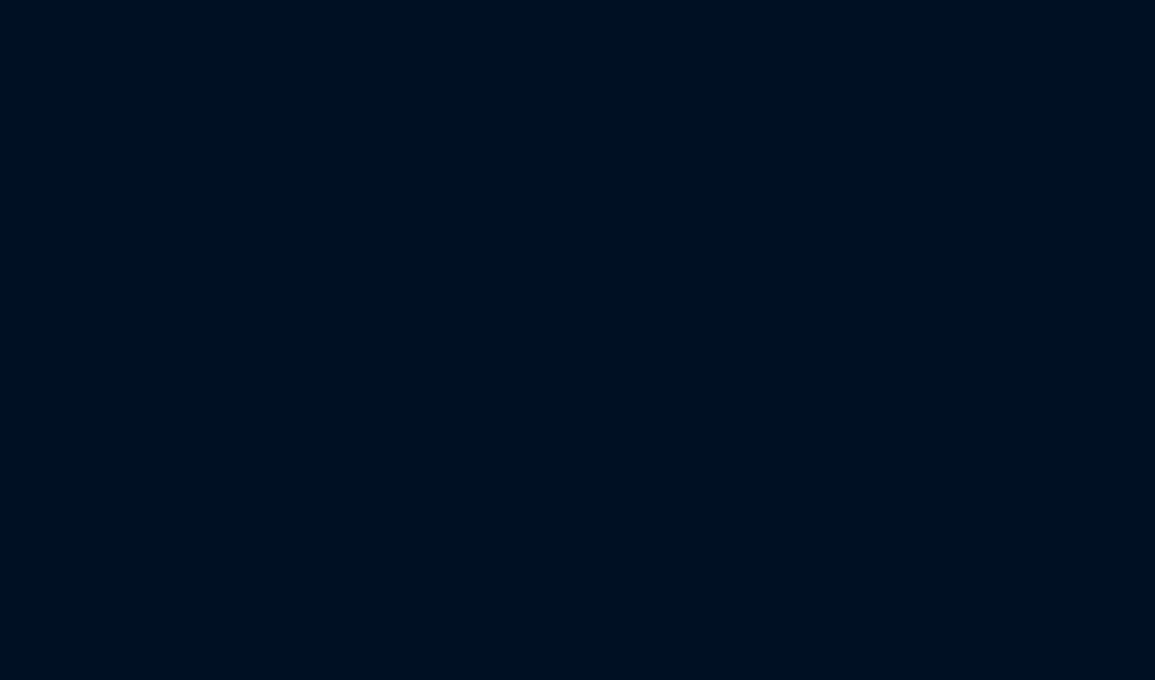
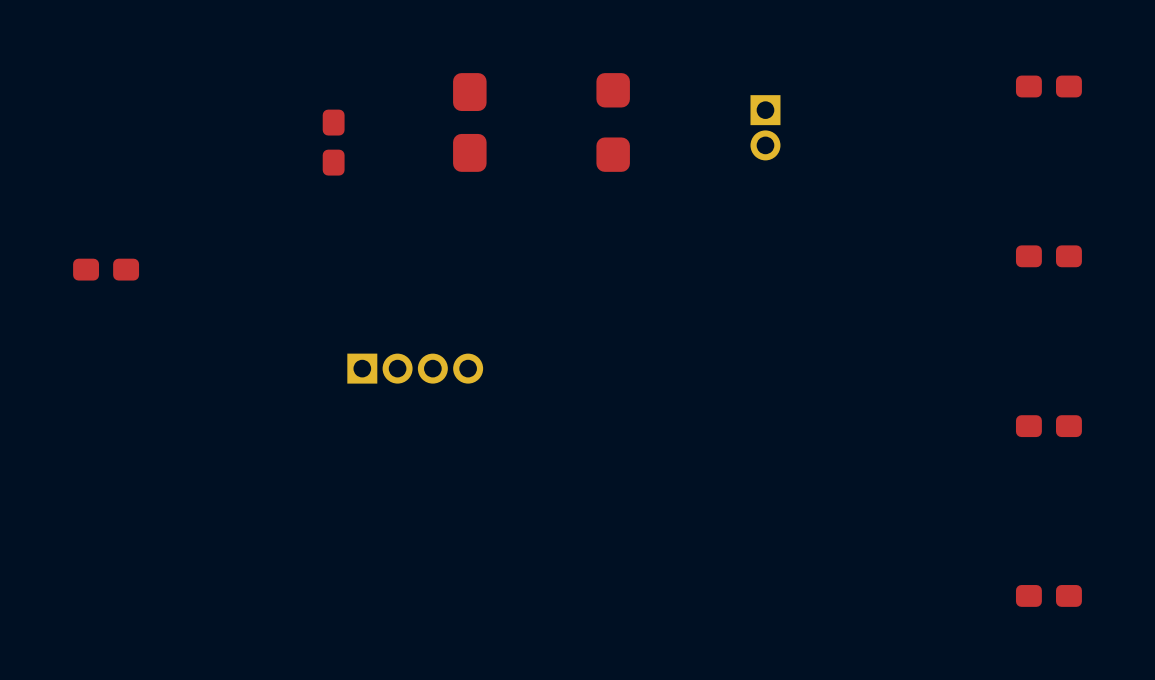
part: none -> (1048, 86)
part: none -> (469, 122)
part: none -> (613, 122)
part: none -> (765, 127)
part: none -> (333, 142)
part: none -> (1048, 256)
part: none -> (106, 269)
part: none -> (415, 368)
part: none -> (1048, 426)
part: none -> (1048, 595)

